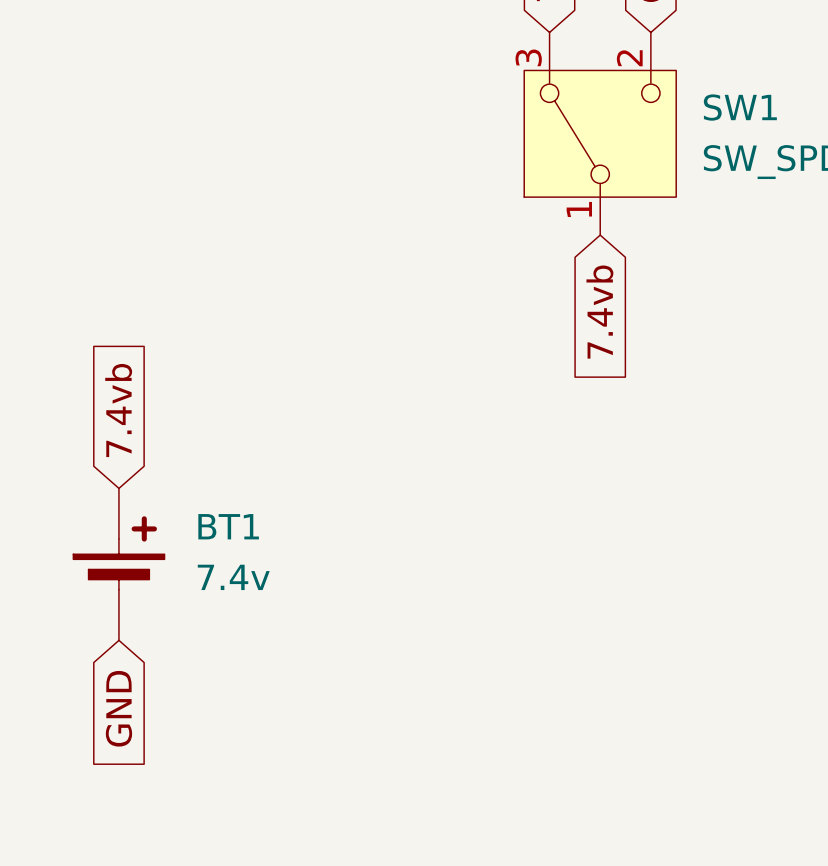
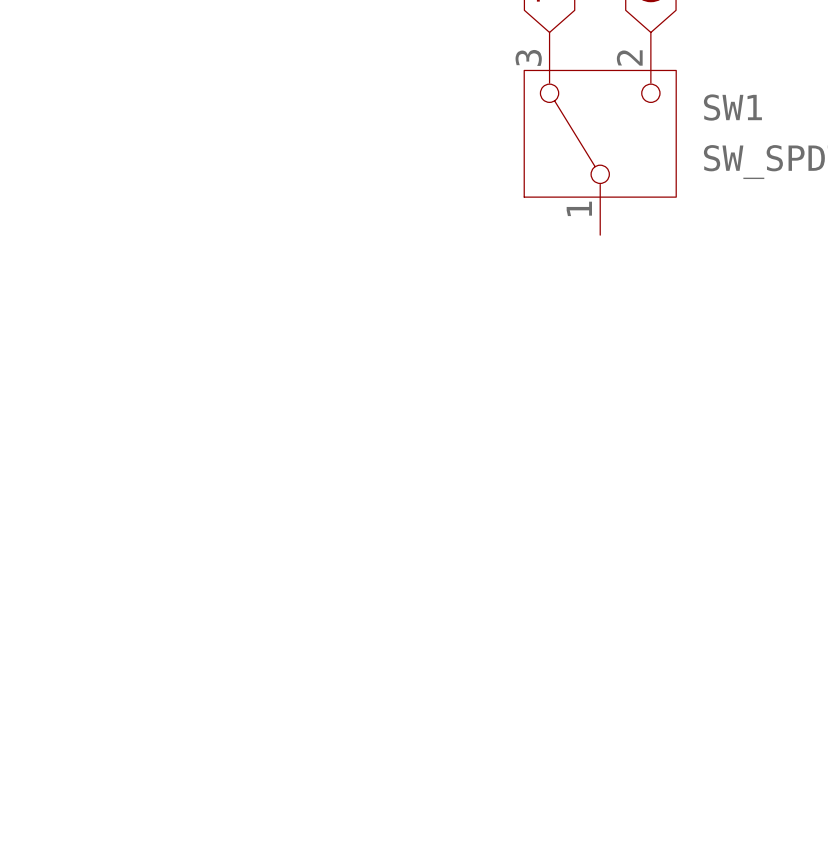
global label: 7.4vb (599, 312) -> none
global label: 7.4vb (118, 410) -> none
BT1: 7.4v (118, 564) -> none
global label: GND (118, 708) -> none

